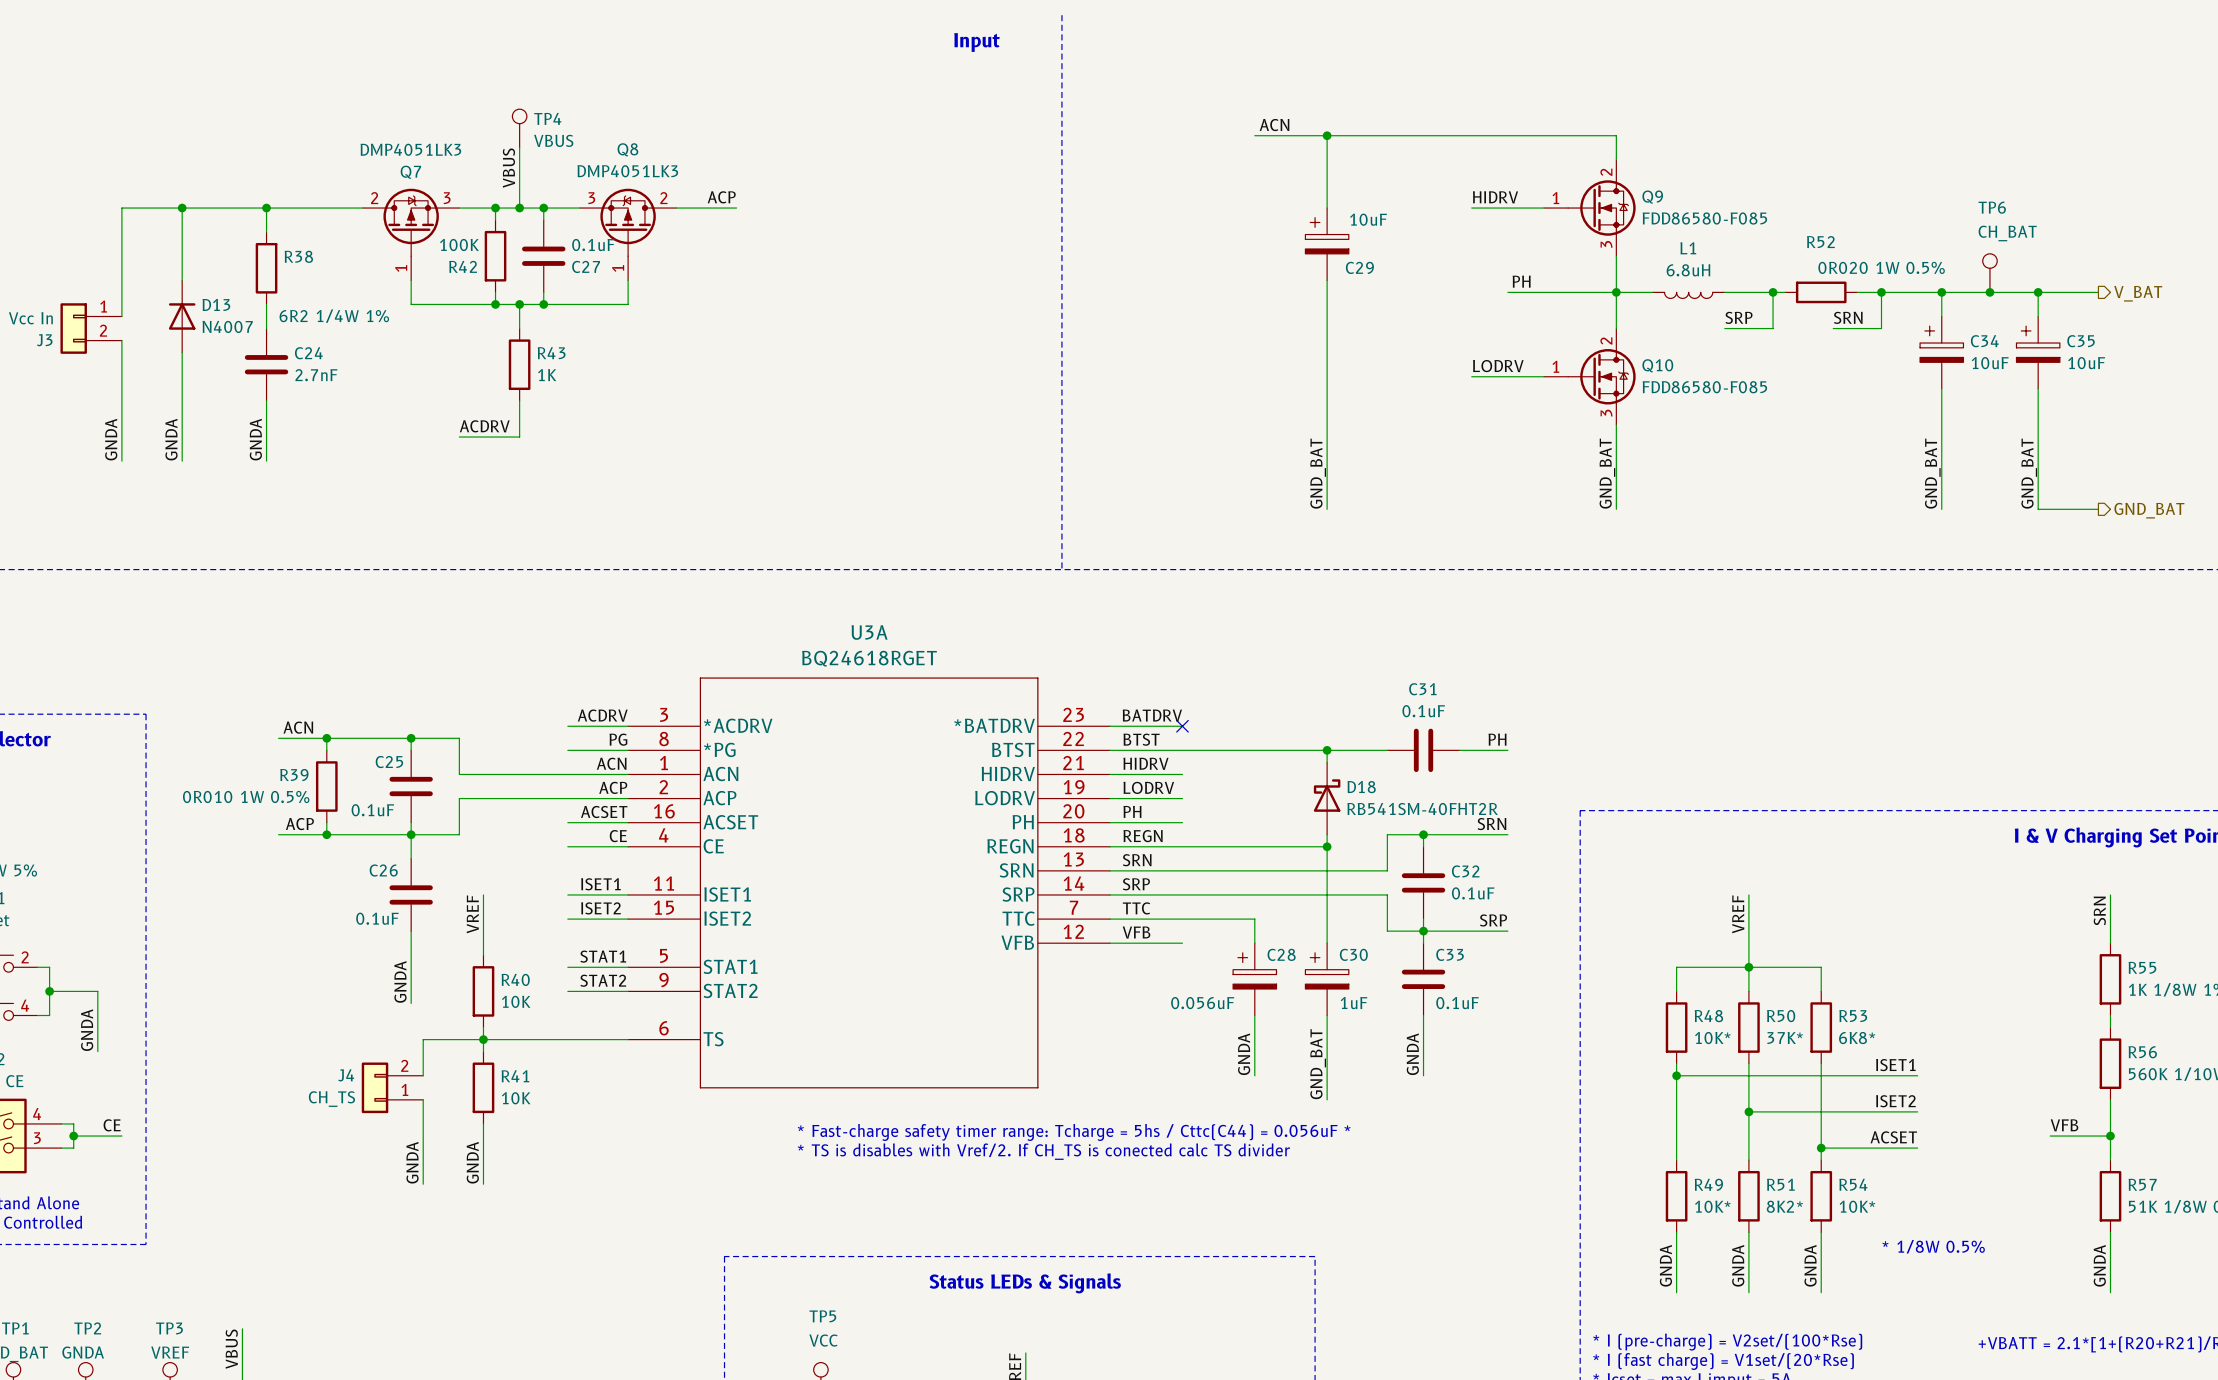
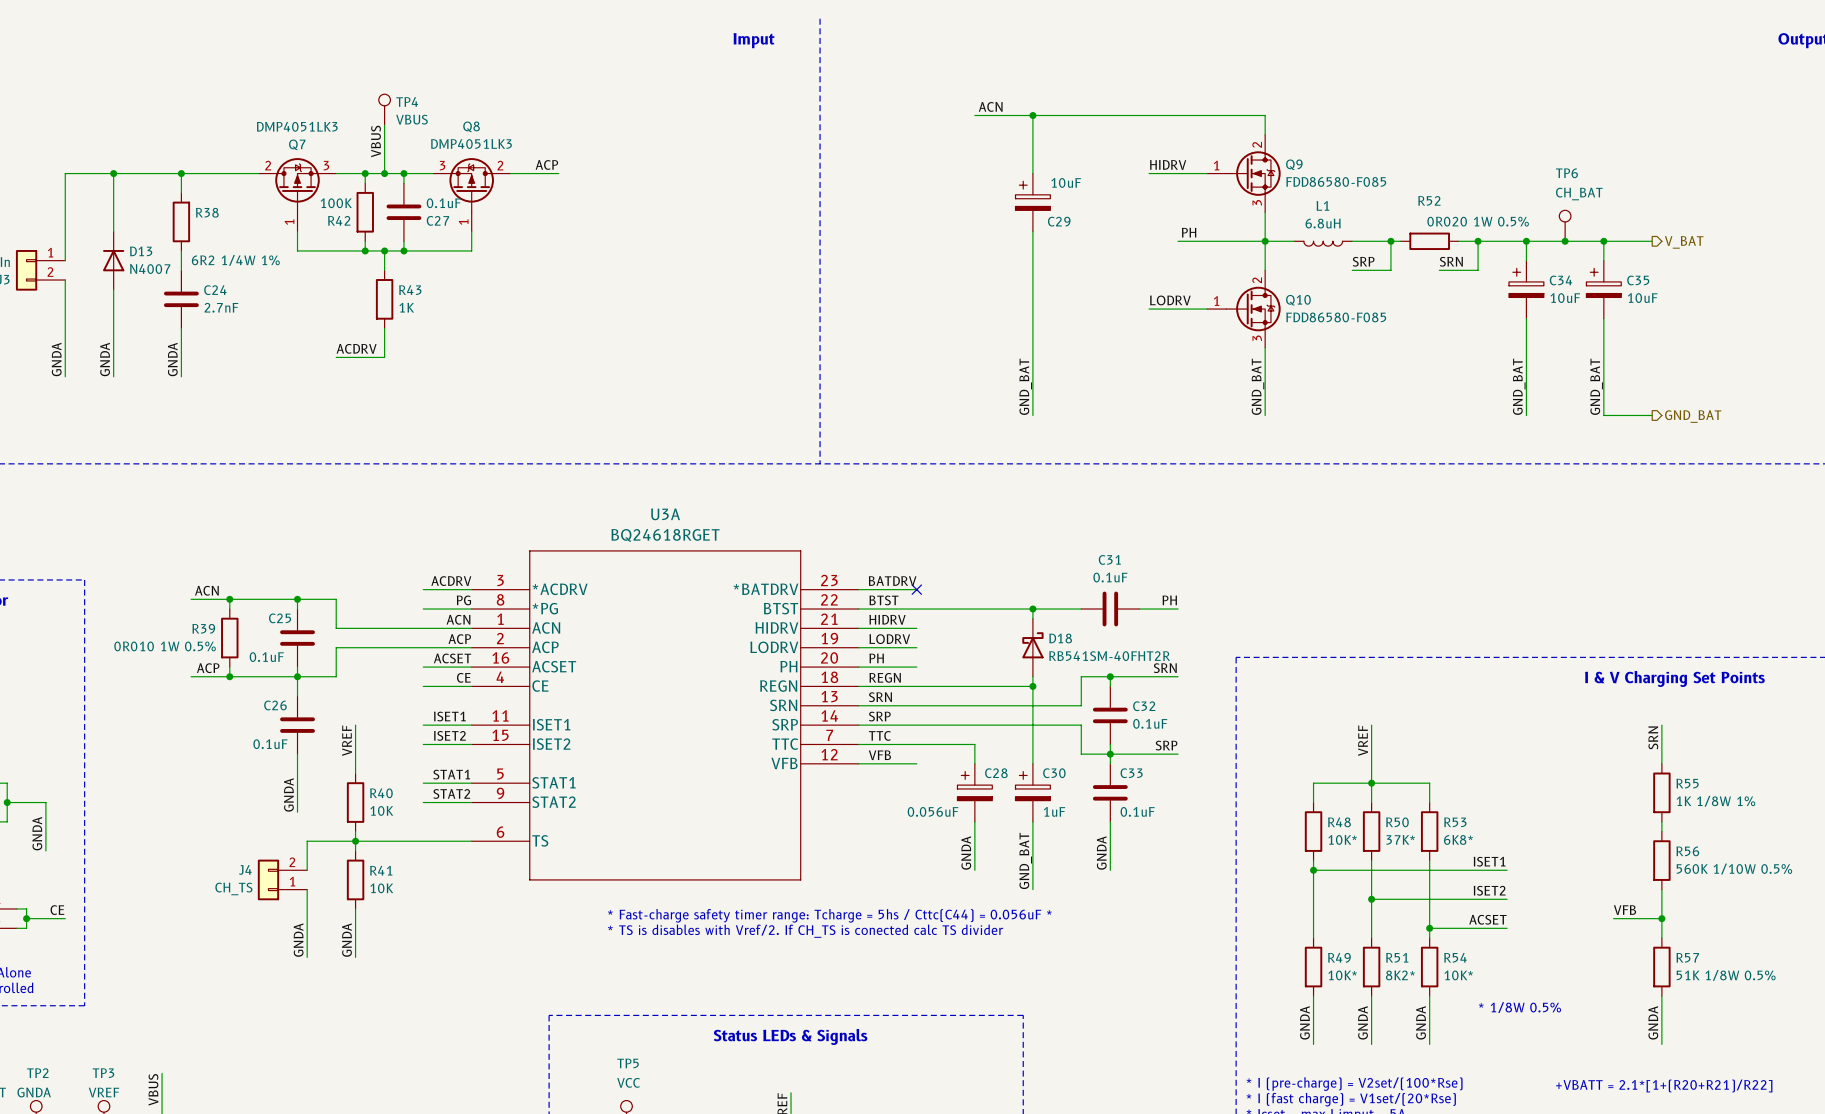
text: Input (976, 42) -> Imput (754, 40)

